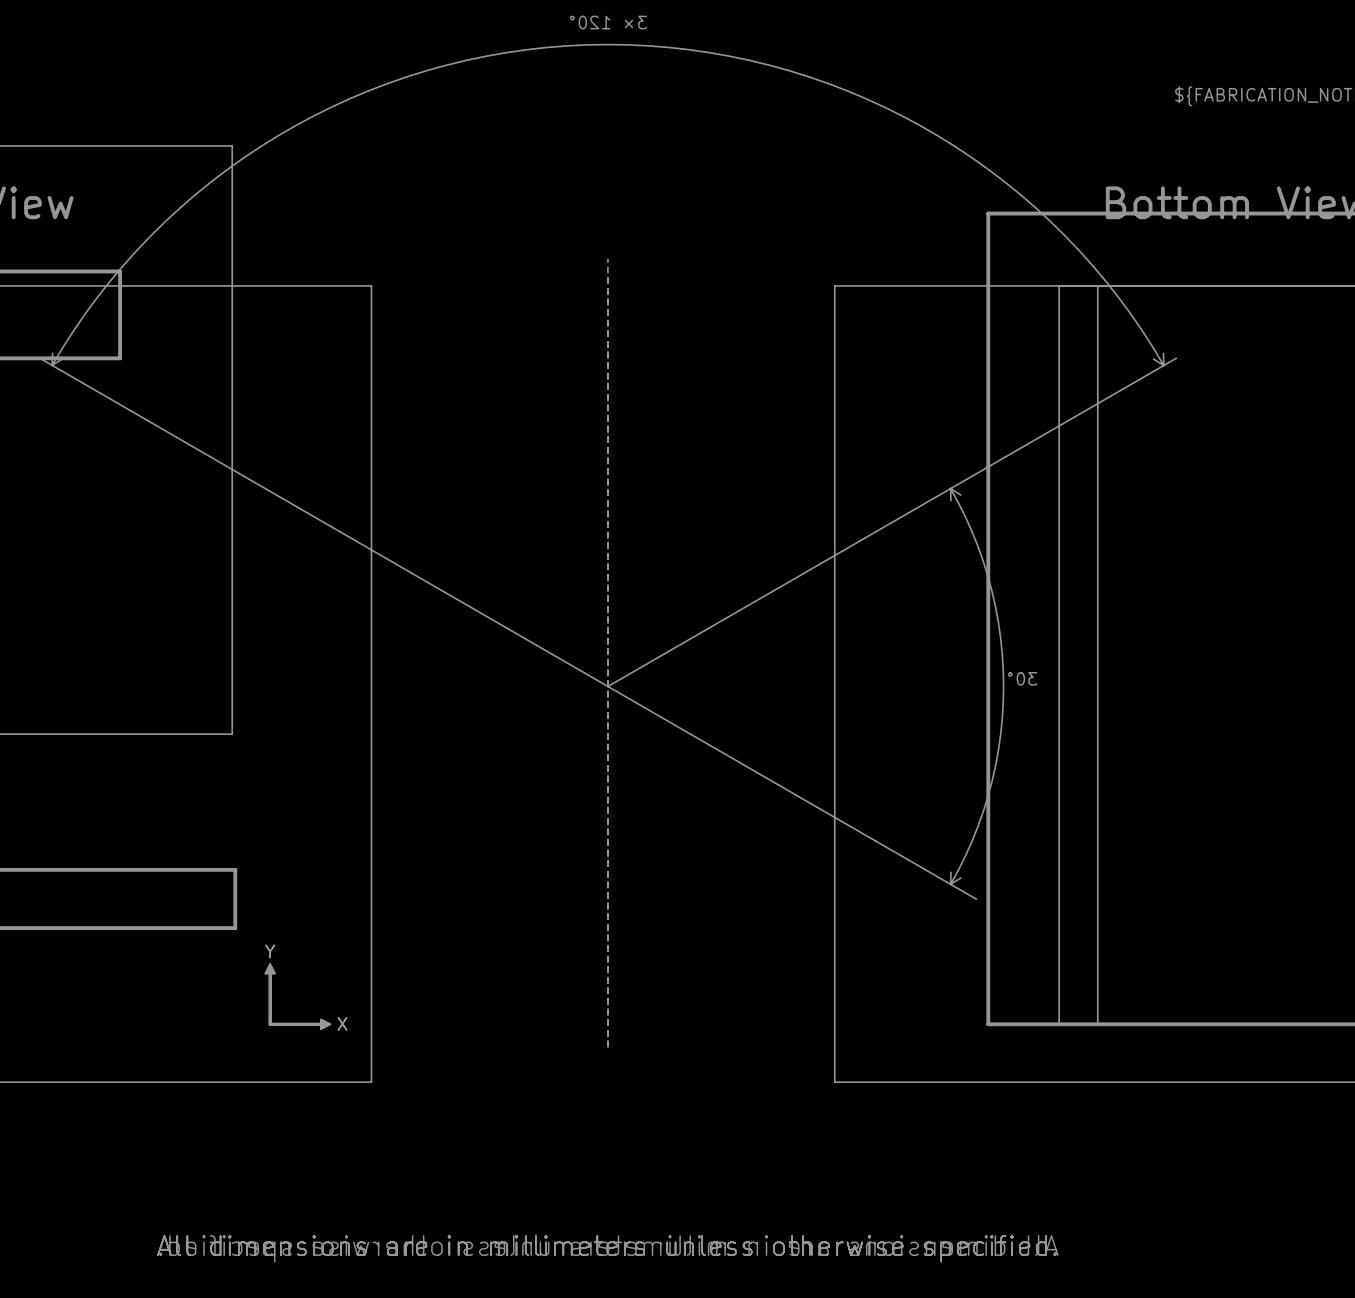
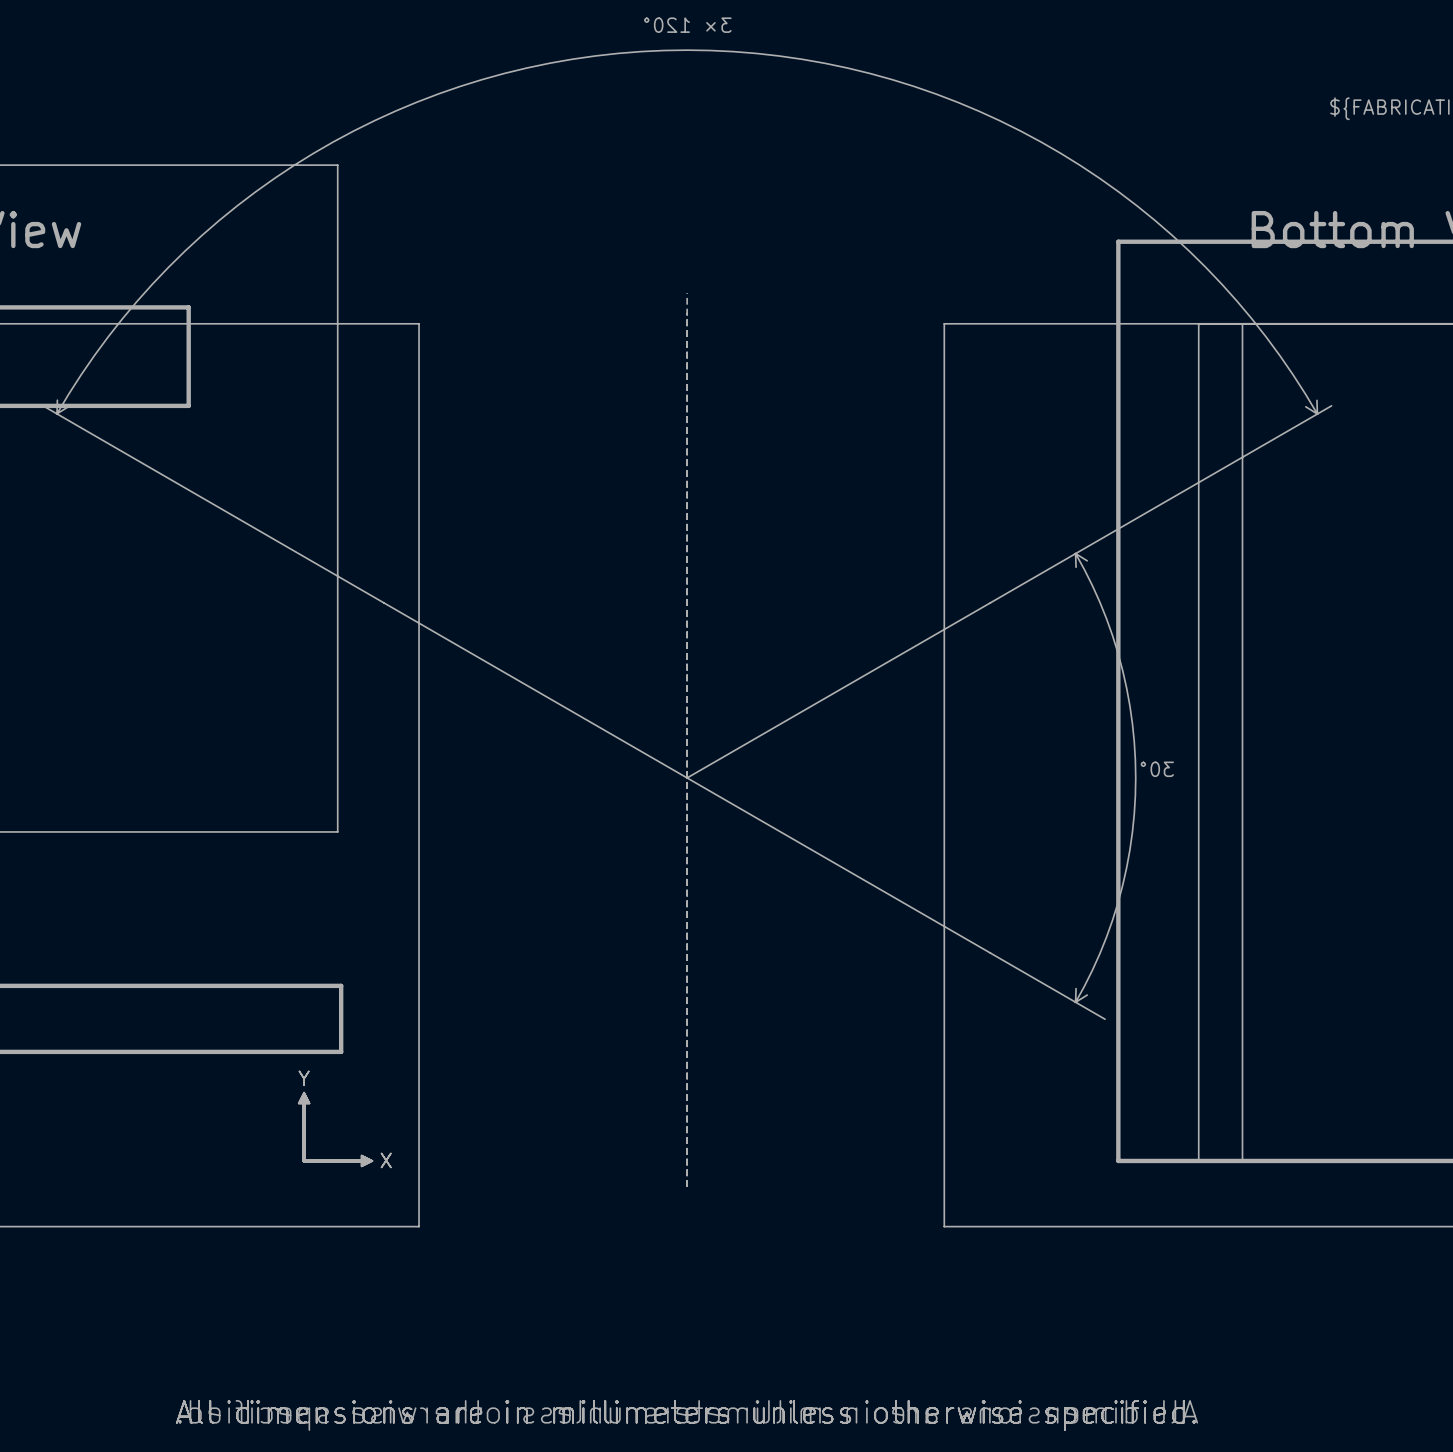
line: (232, 145) (232, 734) -> (261, 165) (337, 165) (337, 831) (261, 831)
line: (120, 271) (120, 358) -> (133, 307) (188, 307) (188, 405) (133, 405)
line: (235, 869) (235, 928) -> (264, 985) (341, 985) (341, 1051) (264, 1051)

